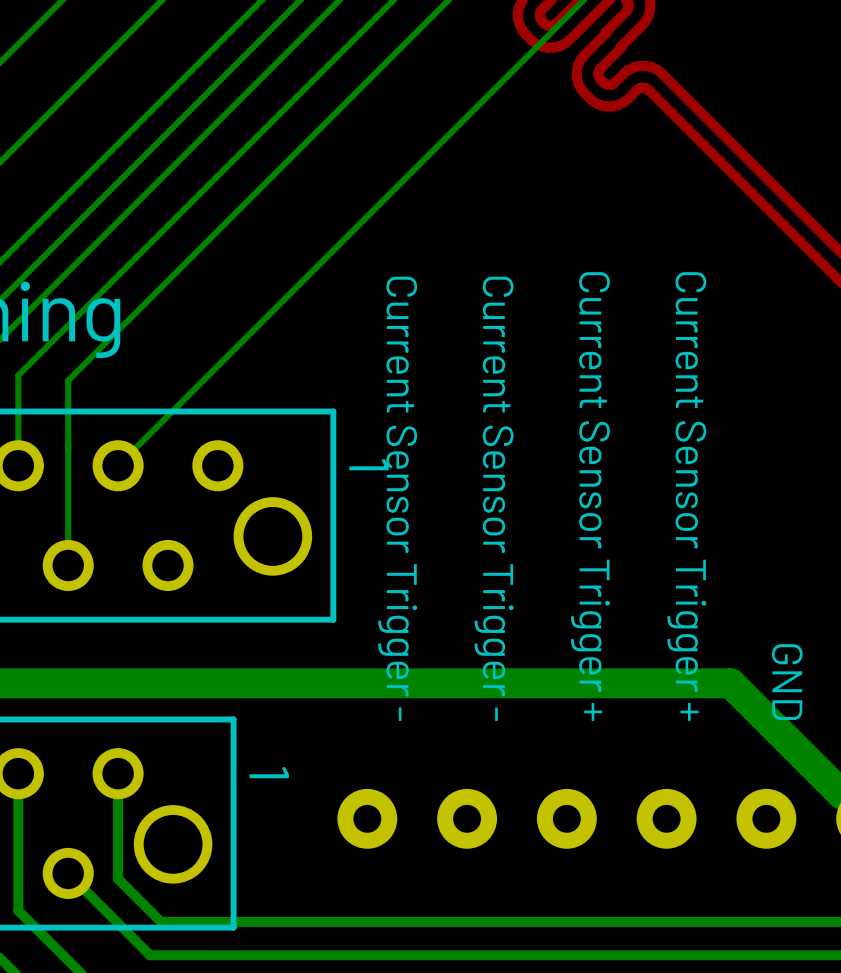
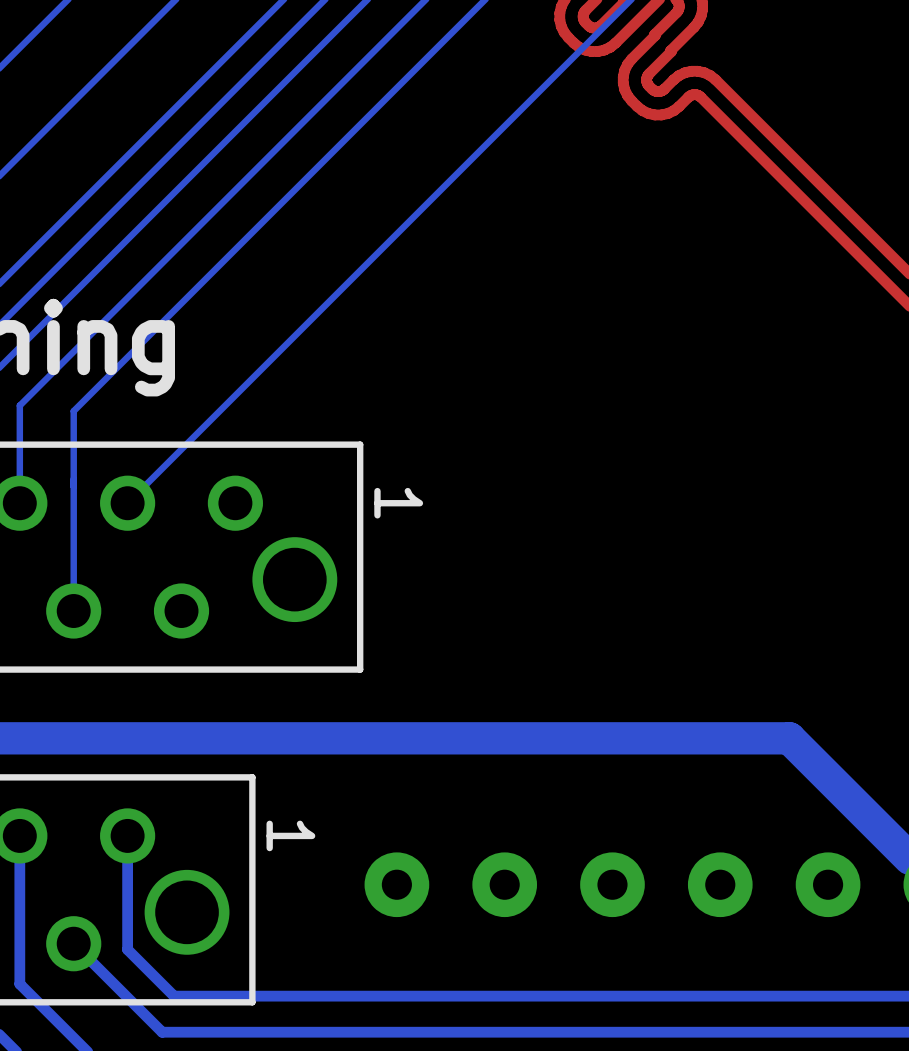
text: Current Sensor Trigger + (590, 496) -> none
text: Current Sensor Trigger + (686, 496) -> none
text: Current Sensor Trigger - (397, 498) -> none
text: Current Sensor Trigger - (494, 498) -> none
text: GND (787, 682) -> none

